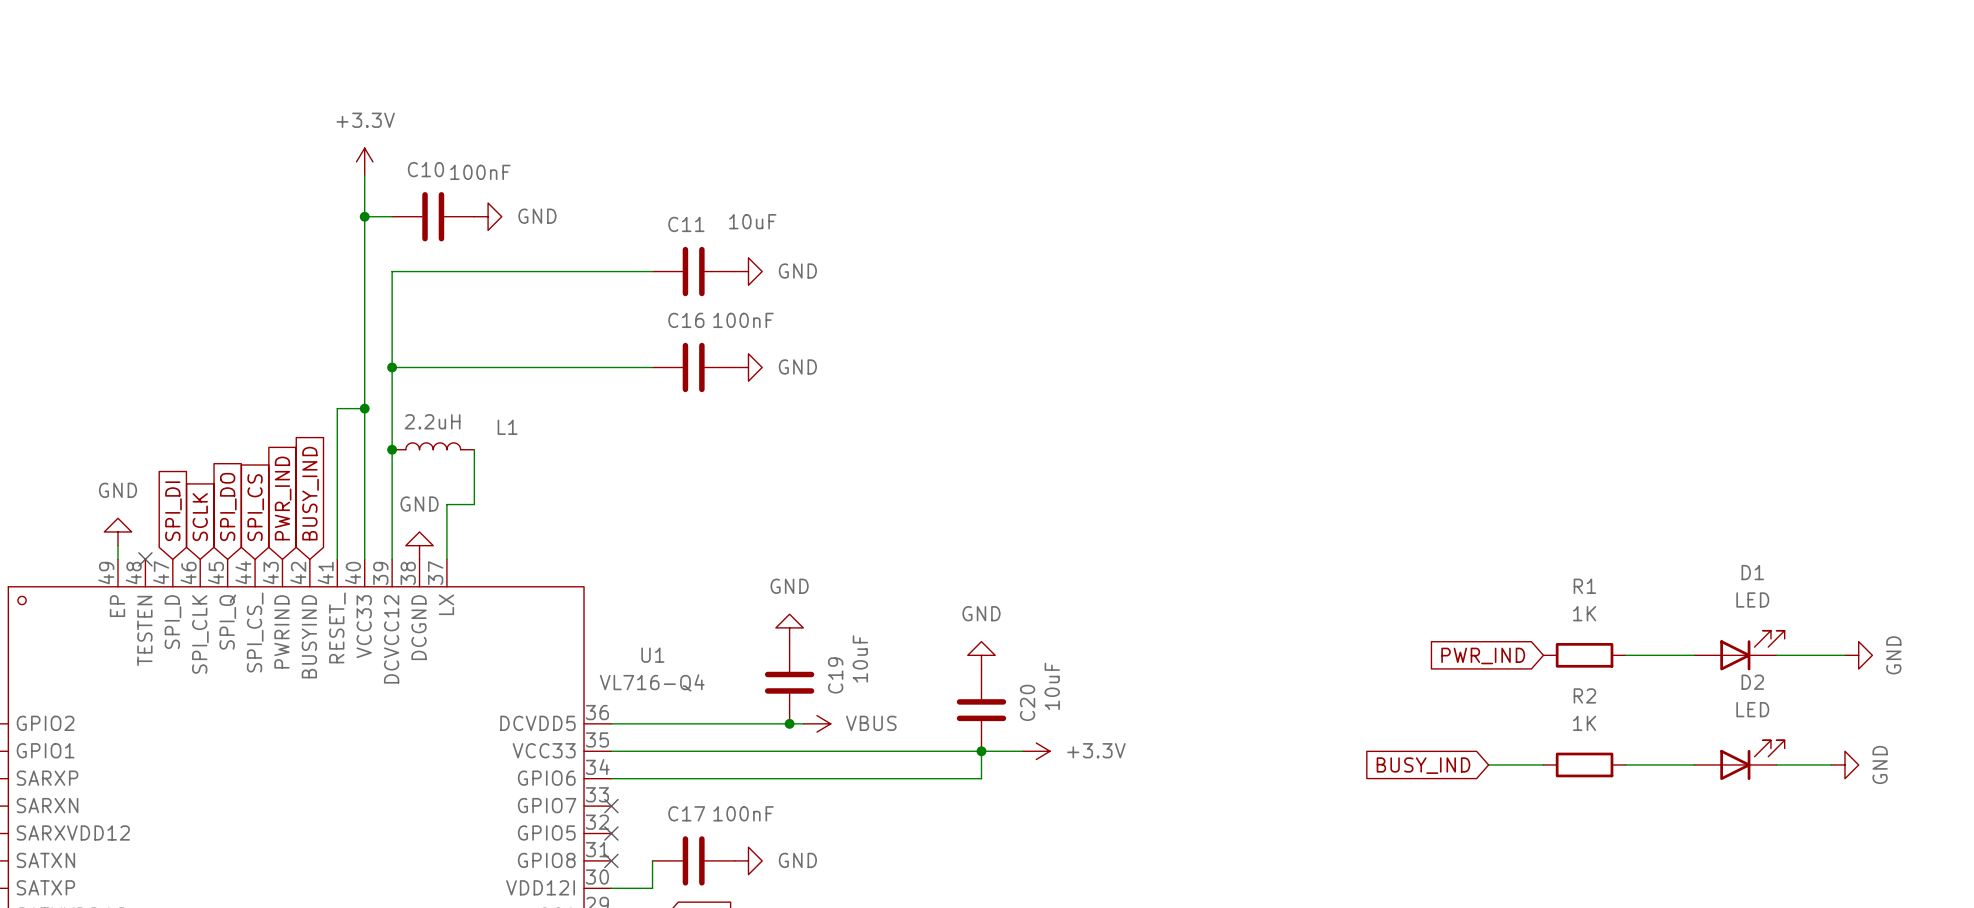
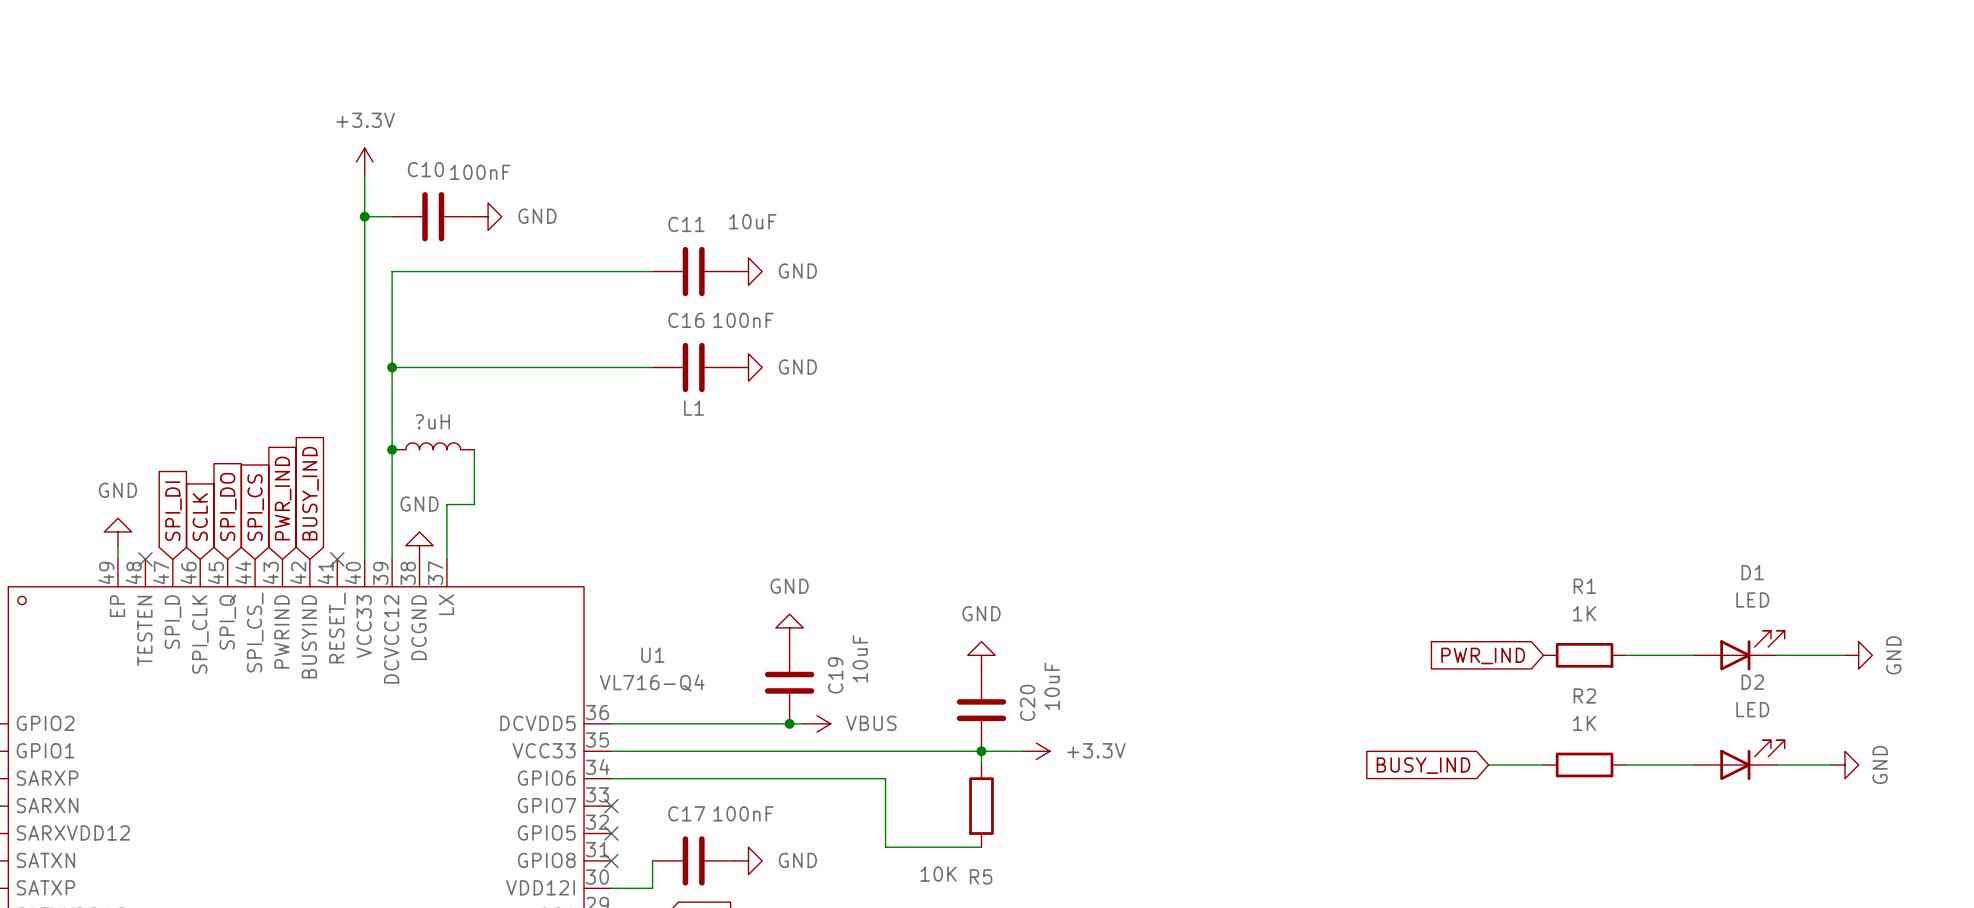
wire: (364, 408) (337, 408) (337, 559) -> none
junction: (364, 408) -> none
L1 value: 2.2uH (432, 421) -> ?uH (432, 421)
L1 name position: L1 (507, 427) -> L1 (693, 408)
no-connect mark: none -> (337, 559)
wire: (981, 764) (981, 778) (885, 778) -> (981, 847) (885, 847) (885, 778)
R5: none -> 10K (981, 806)

